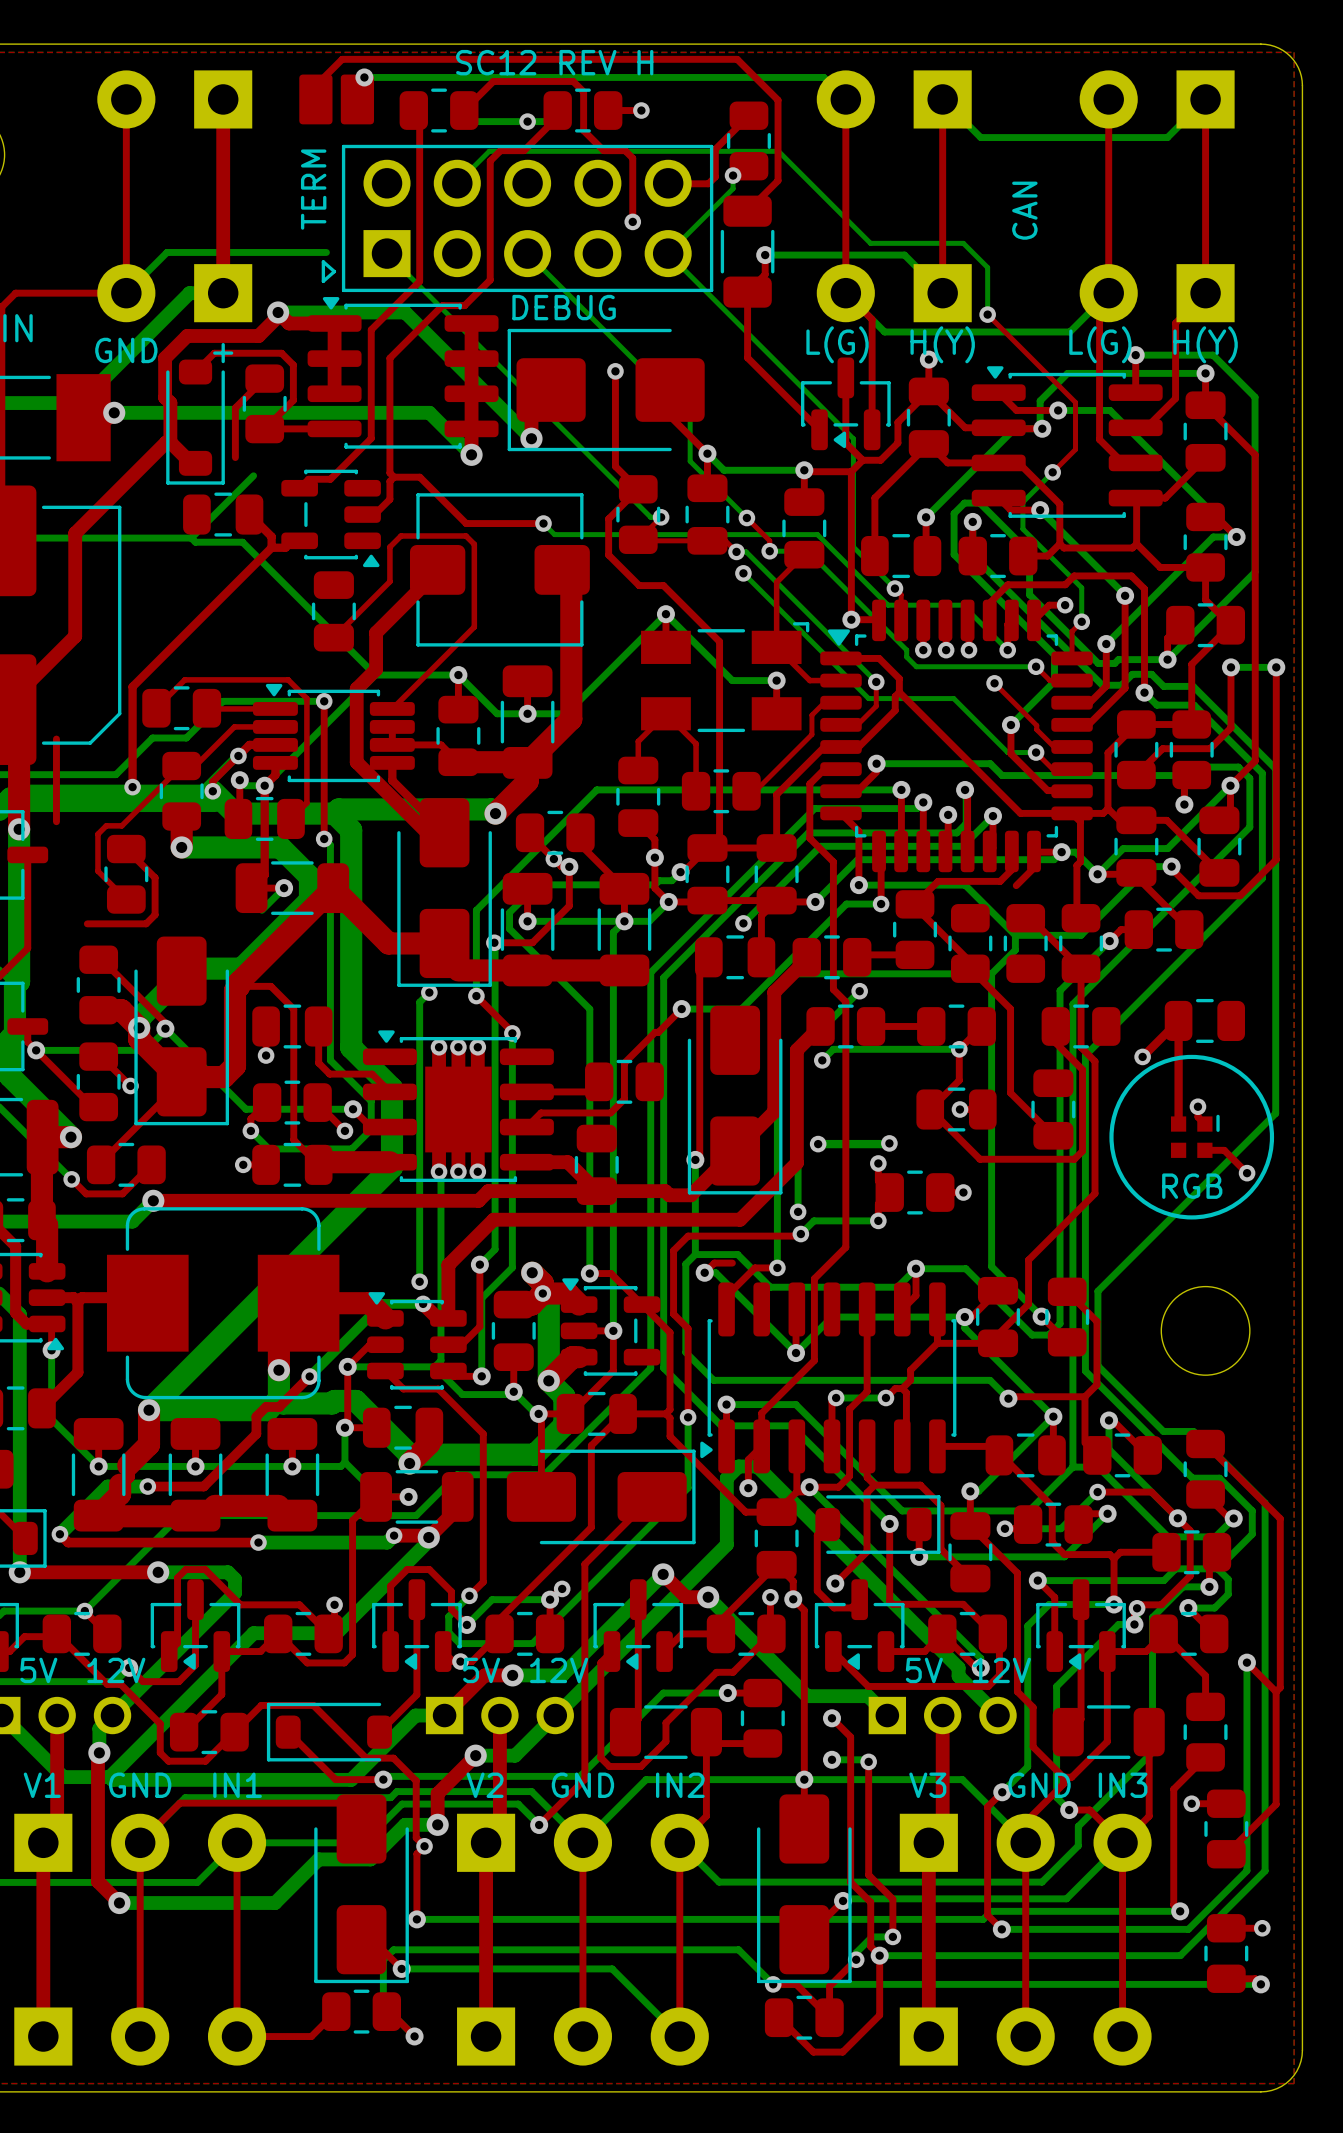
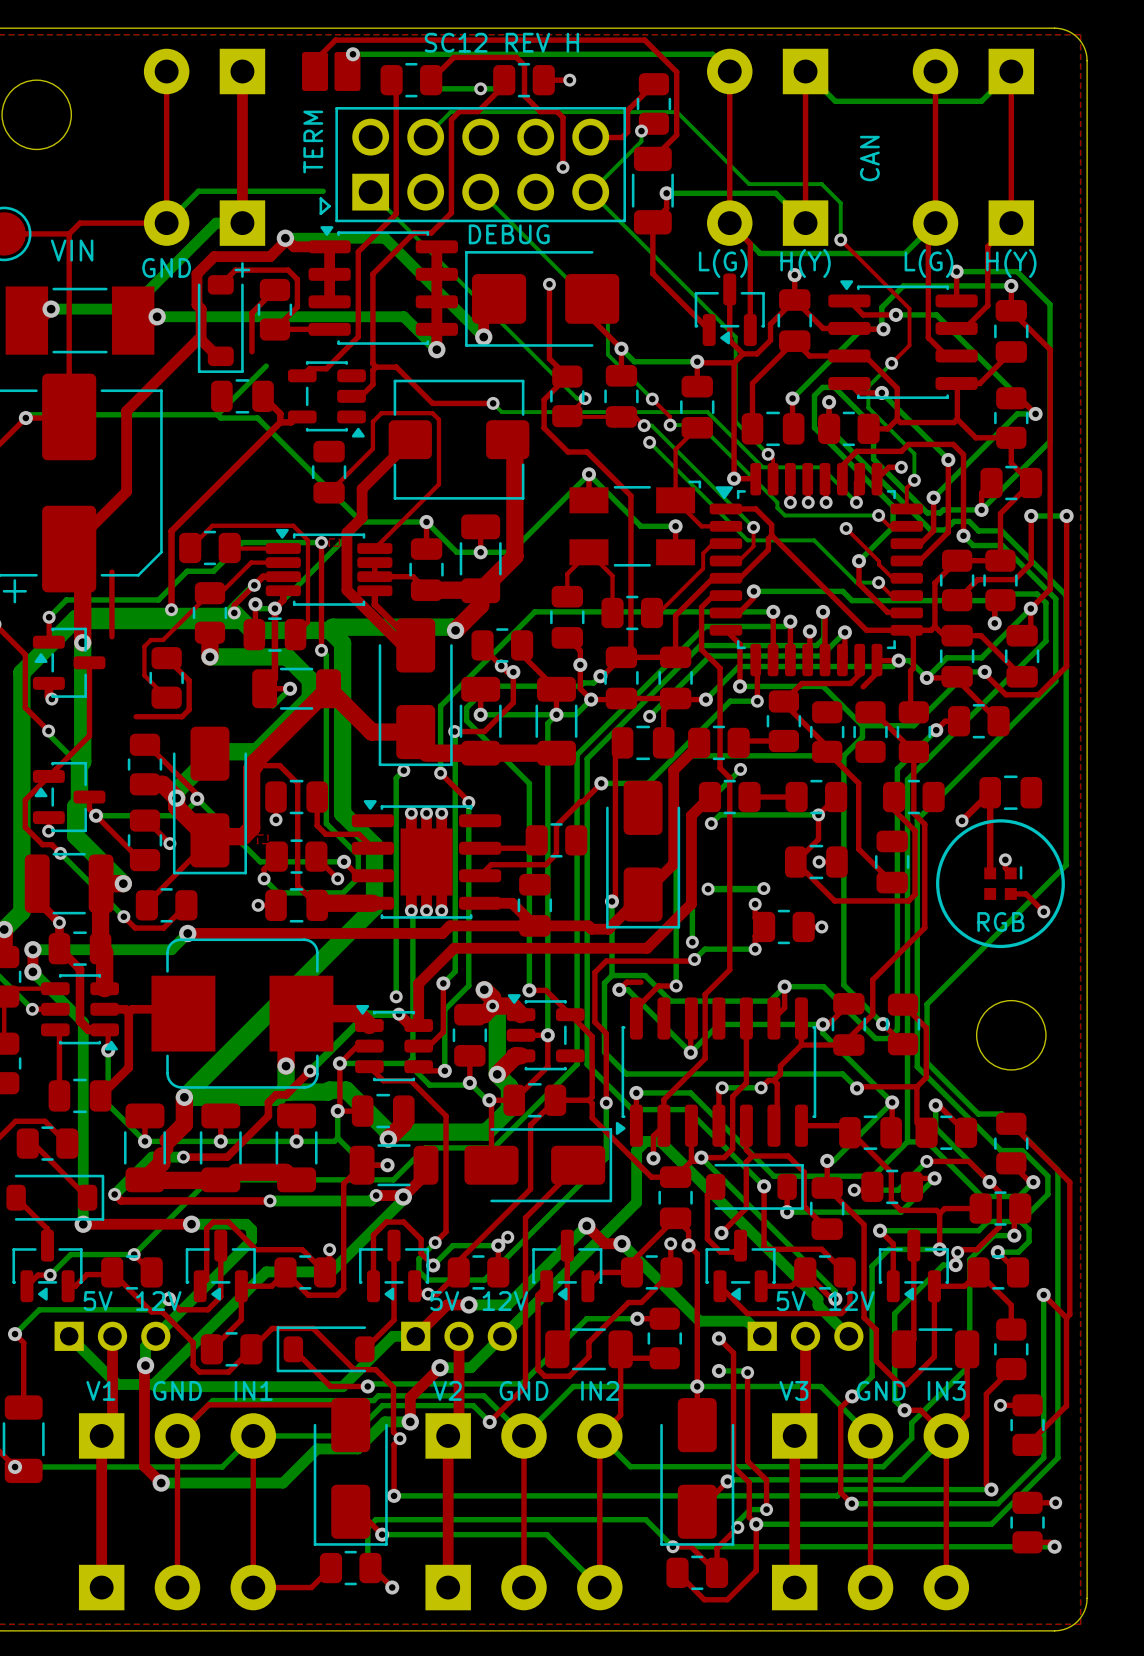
top zone outline: none -> (329, 538) (339, 538) (339, 546) (329, 546) (329, 538)
top zone outline: none -> (257, 834) (268, 834) (268, 843) (257, 843) (257, 834)
top track: (1063, 1777) (1063, 1784) (1025, 1821) (1025, 1842) -> none

